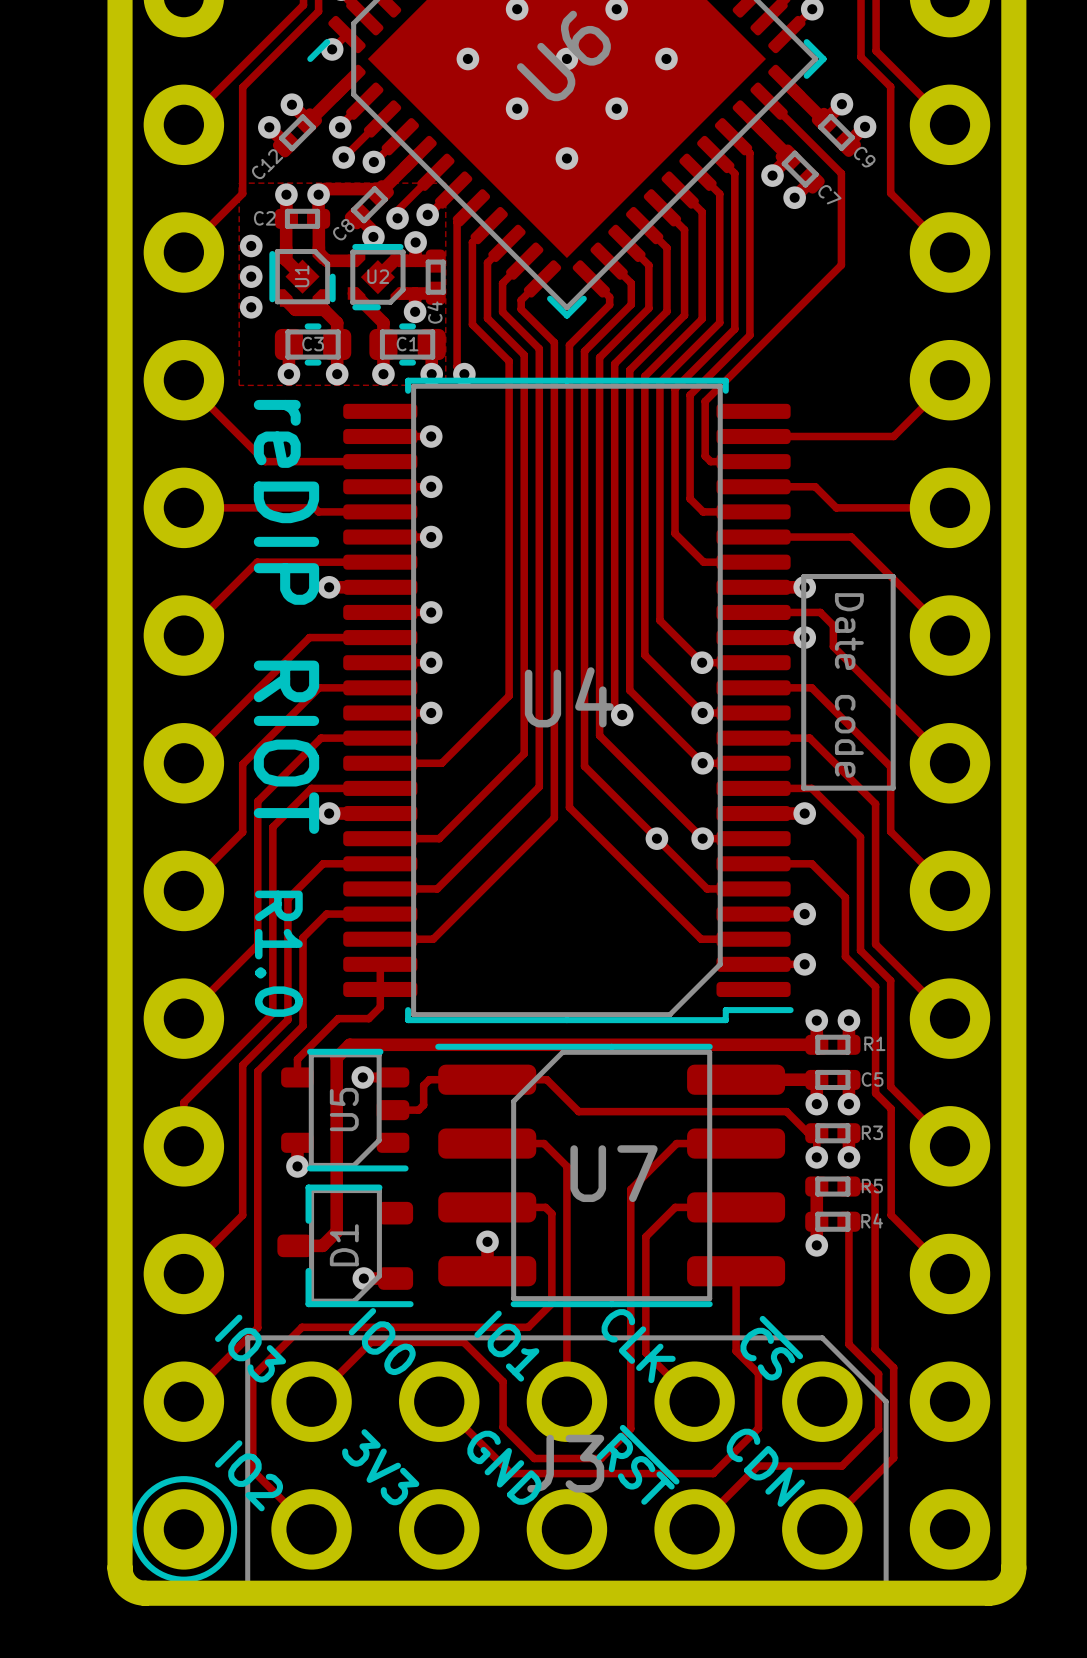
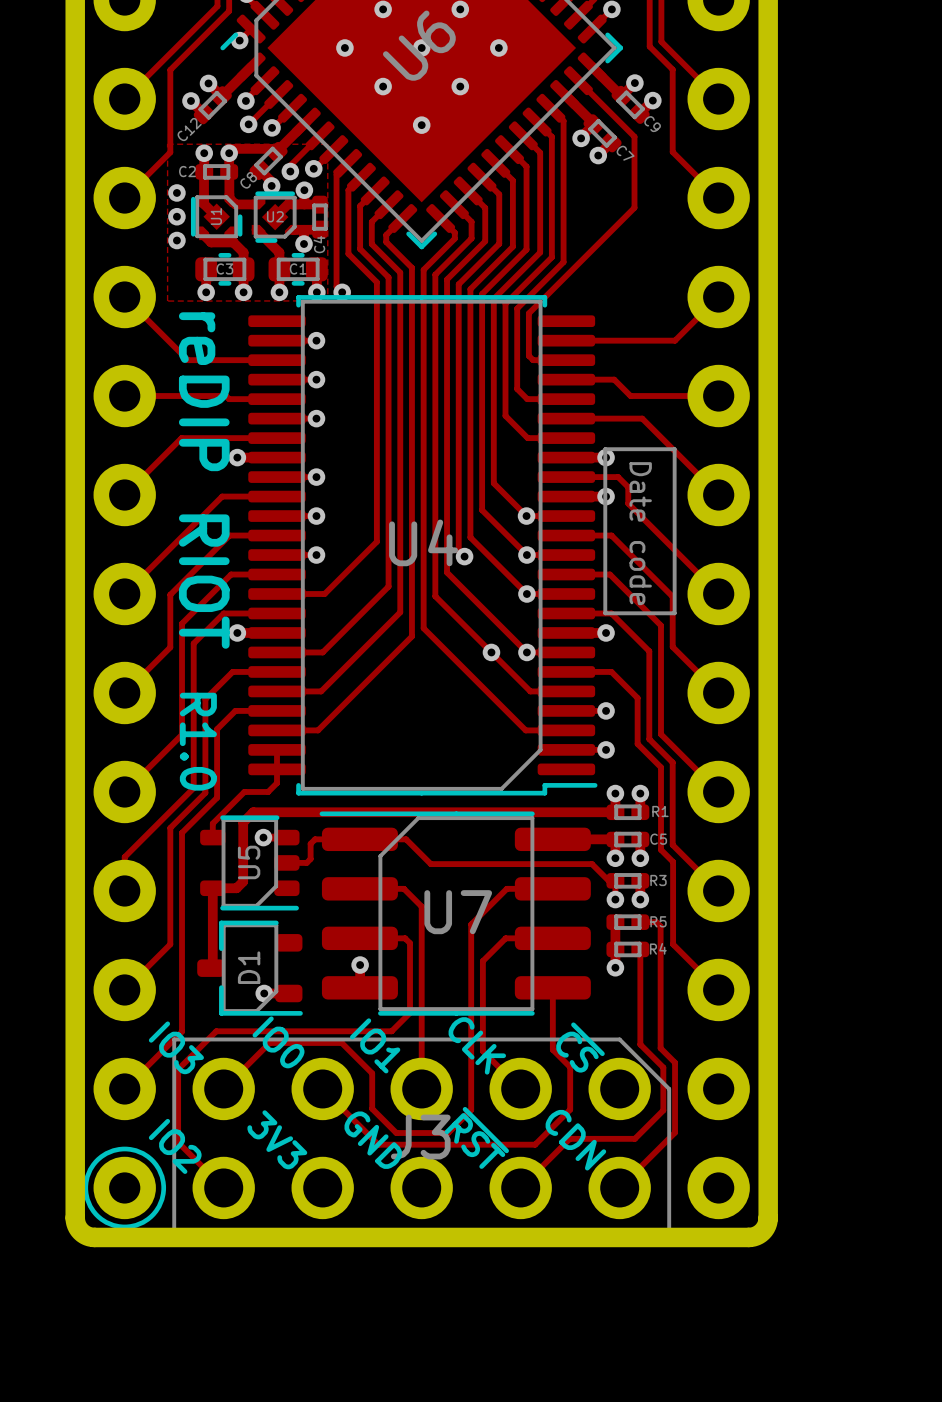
track: (336, 1134) (336, 1231) (322, 1245) (294, 1245) -> (212, 906) (212, 966) (210, 968)
track: none -> (243, 881) (236, 888) (212, 888)
via: (297, 1166) -> none

